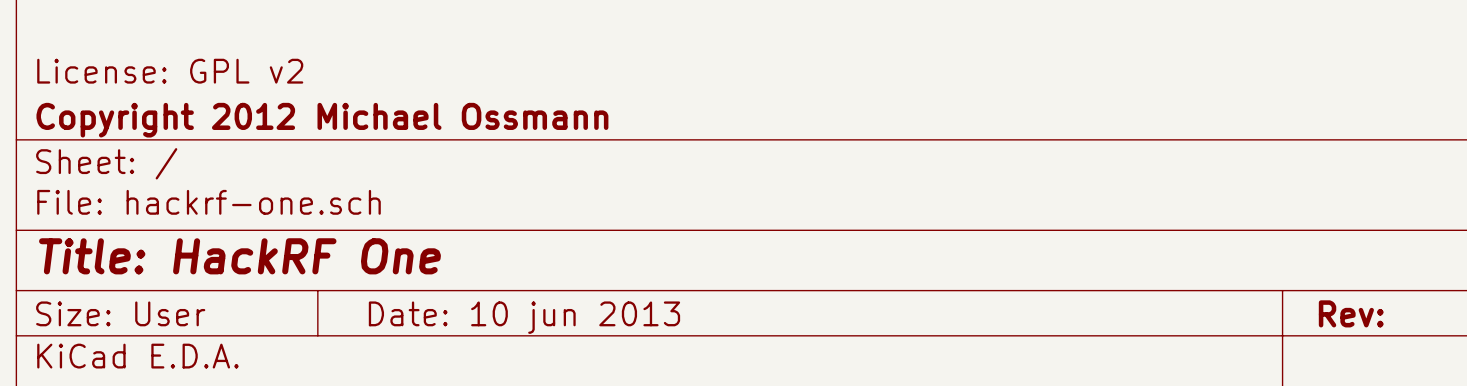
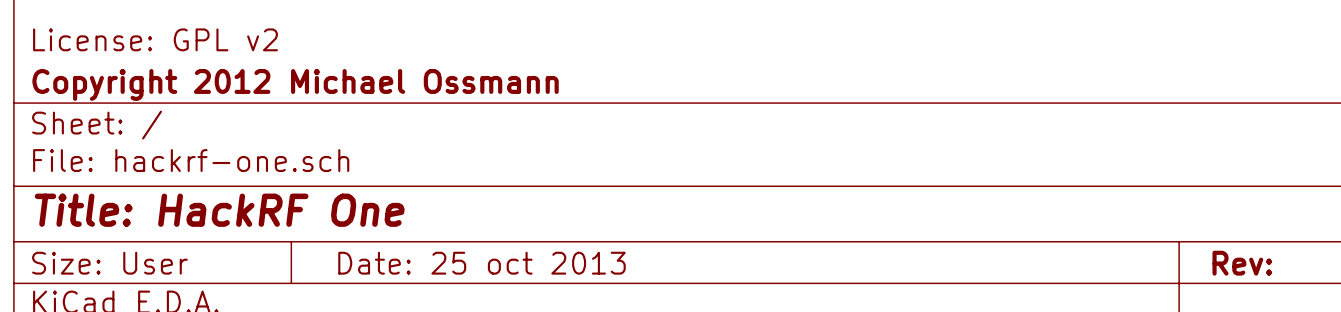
title block: Date: 10 jun 2013 (524, 317) -> Date: 25 oct 2013 (481, 263)

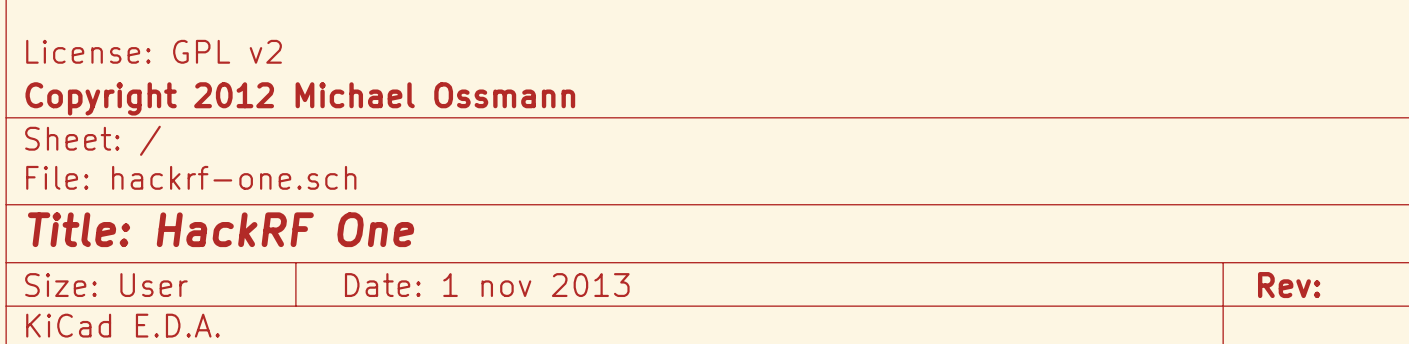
title block: Date: 25 oct 2013 (481, 263) -> Date: 1 nov 2013 (487, 285)

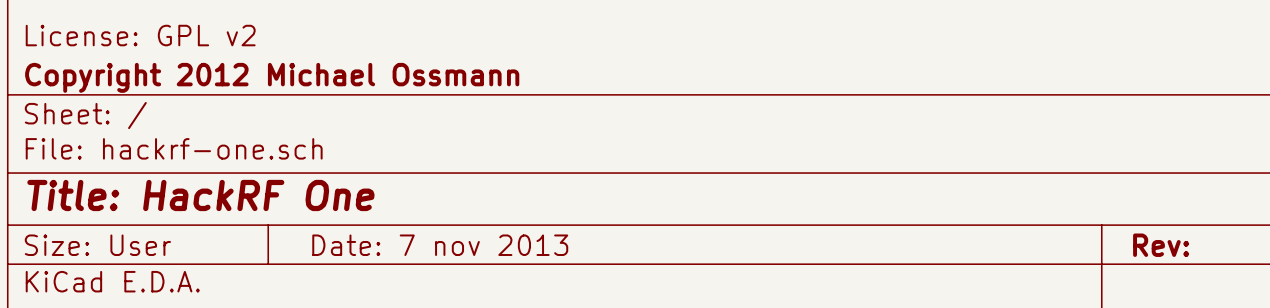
title block: Date: 1 nov 2013 (487, 285) -> Date: 7 nov 2013 (440, 245)

